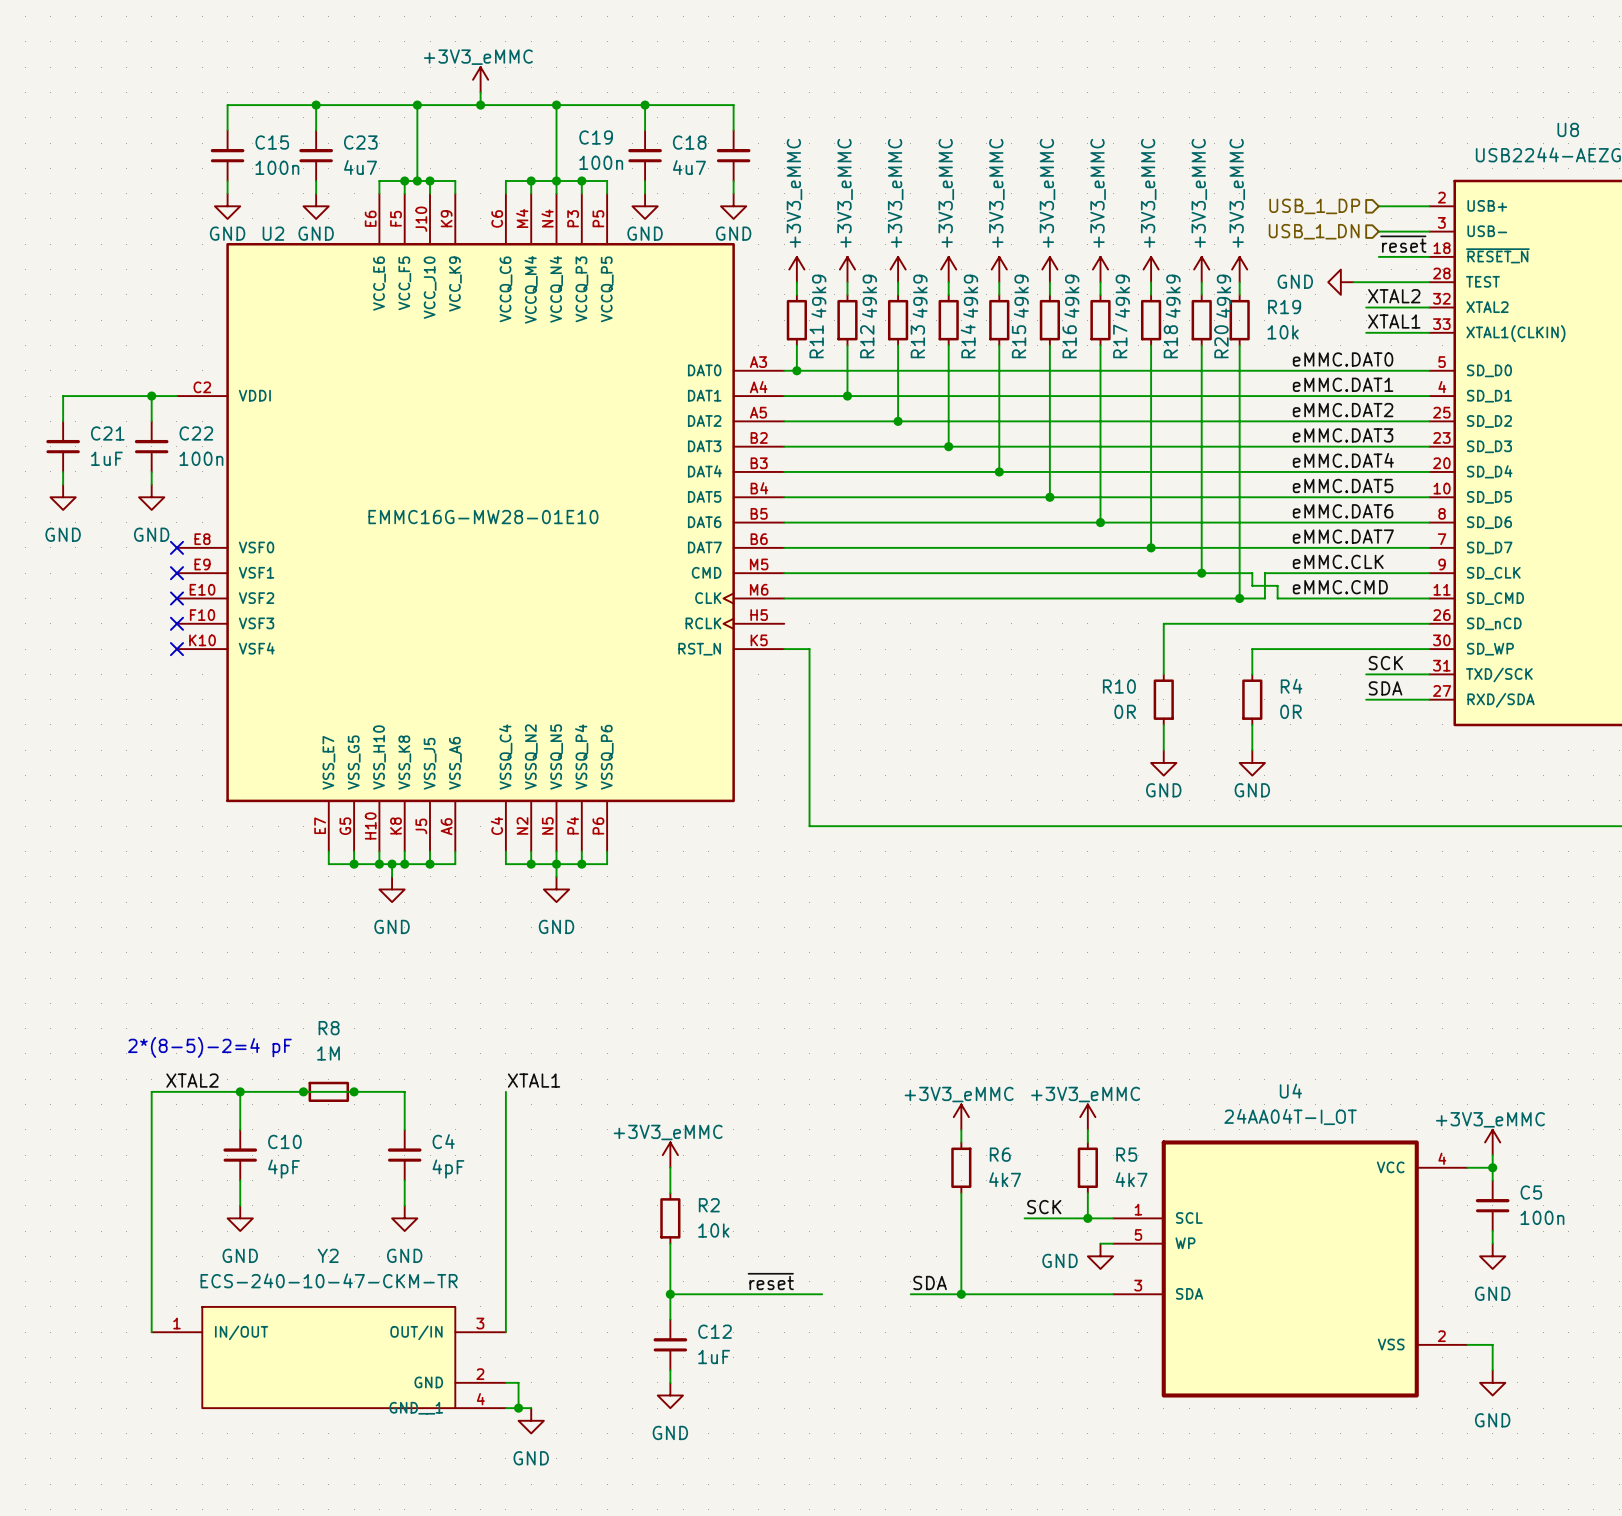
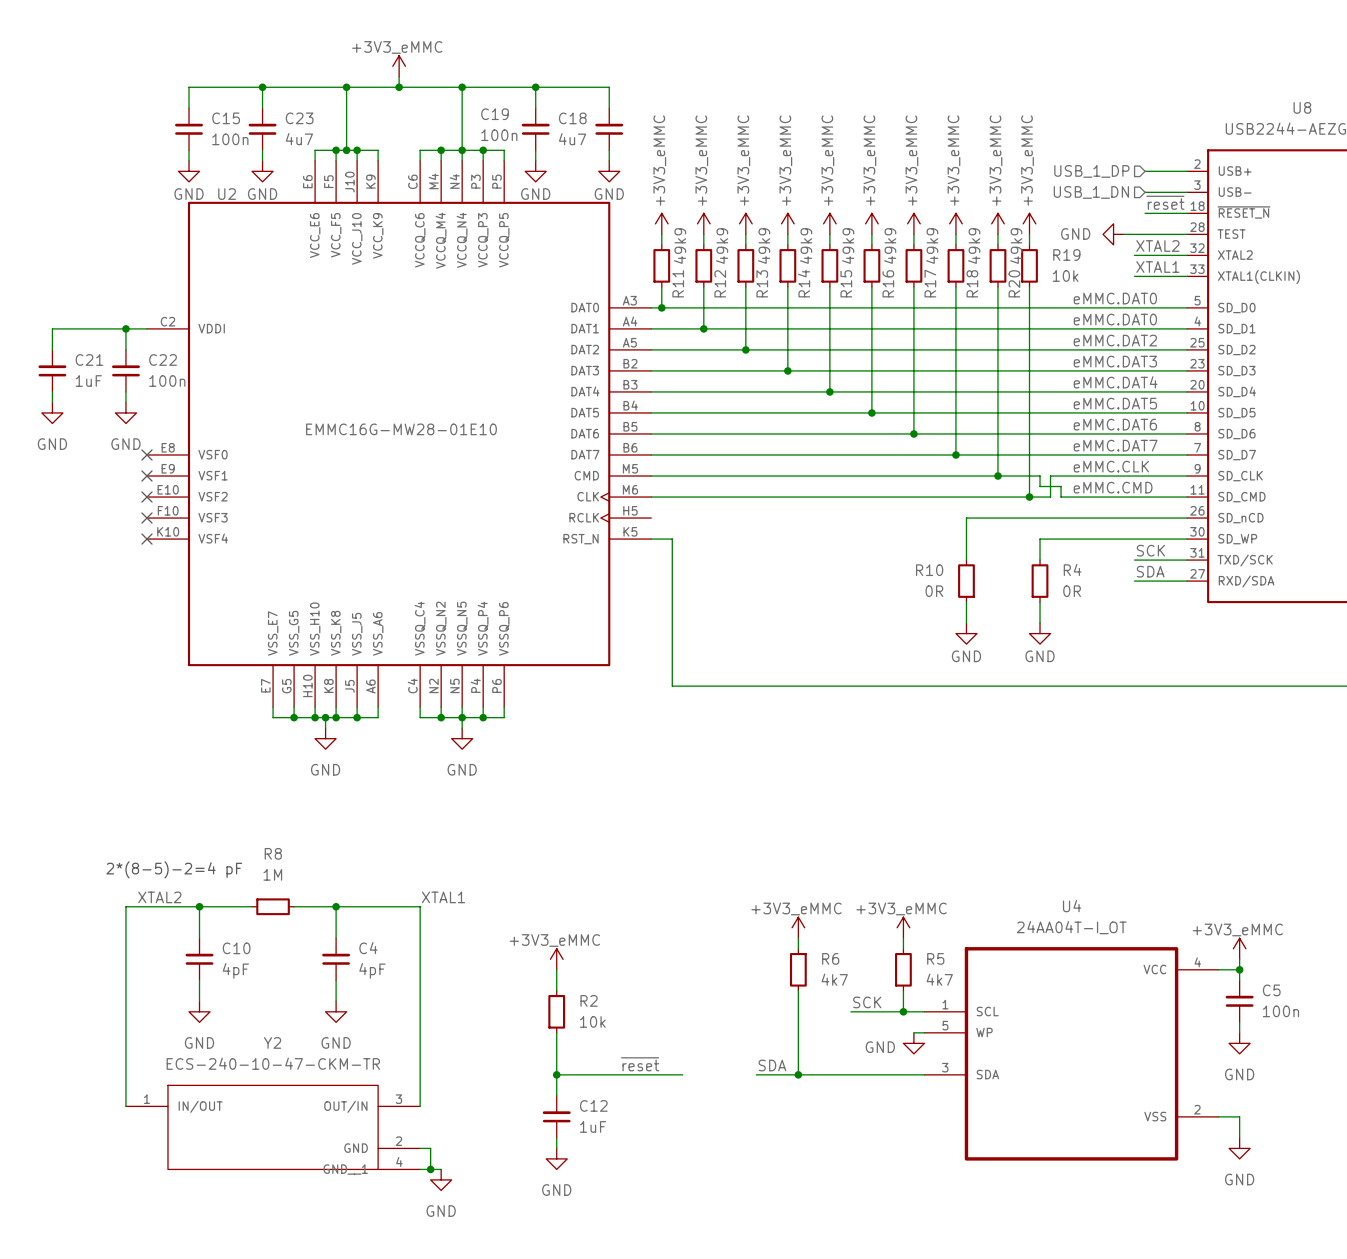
label: eMMC.DAT1 (1343, 384) -> eMMC.DAT0 (1115, 319)
wire: (303, 1091) (354, 1091) -> none
junction: (303, 1091) -> none
junction: (354, 1091) -> none
wire: none -> (336, 906) (420, 906)
junction: none -> (336, 906)

